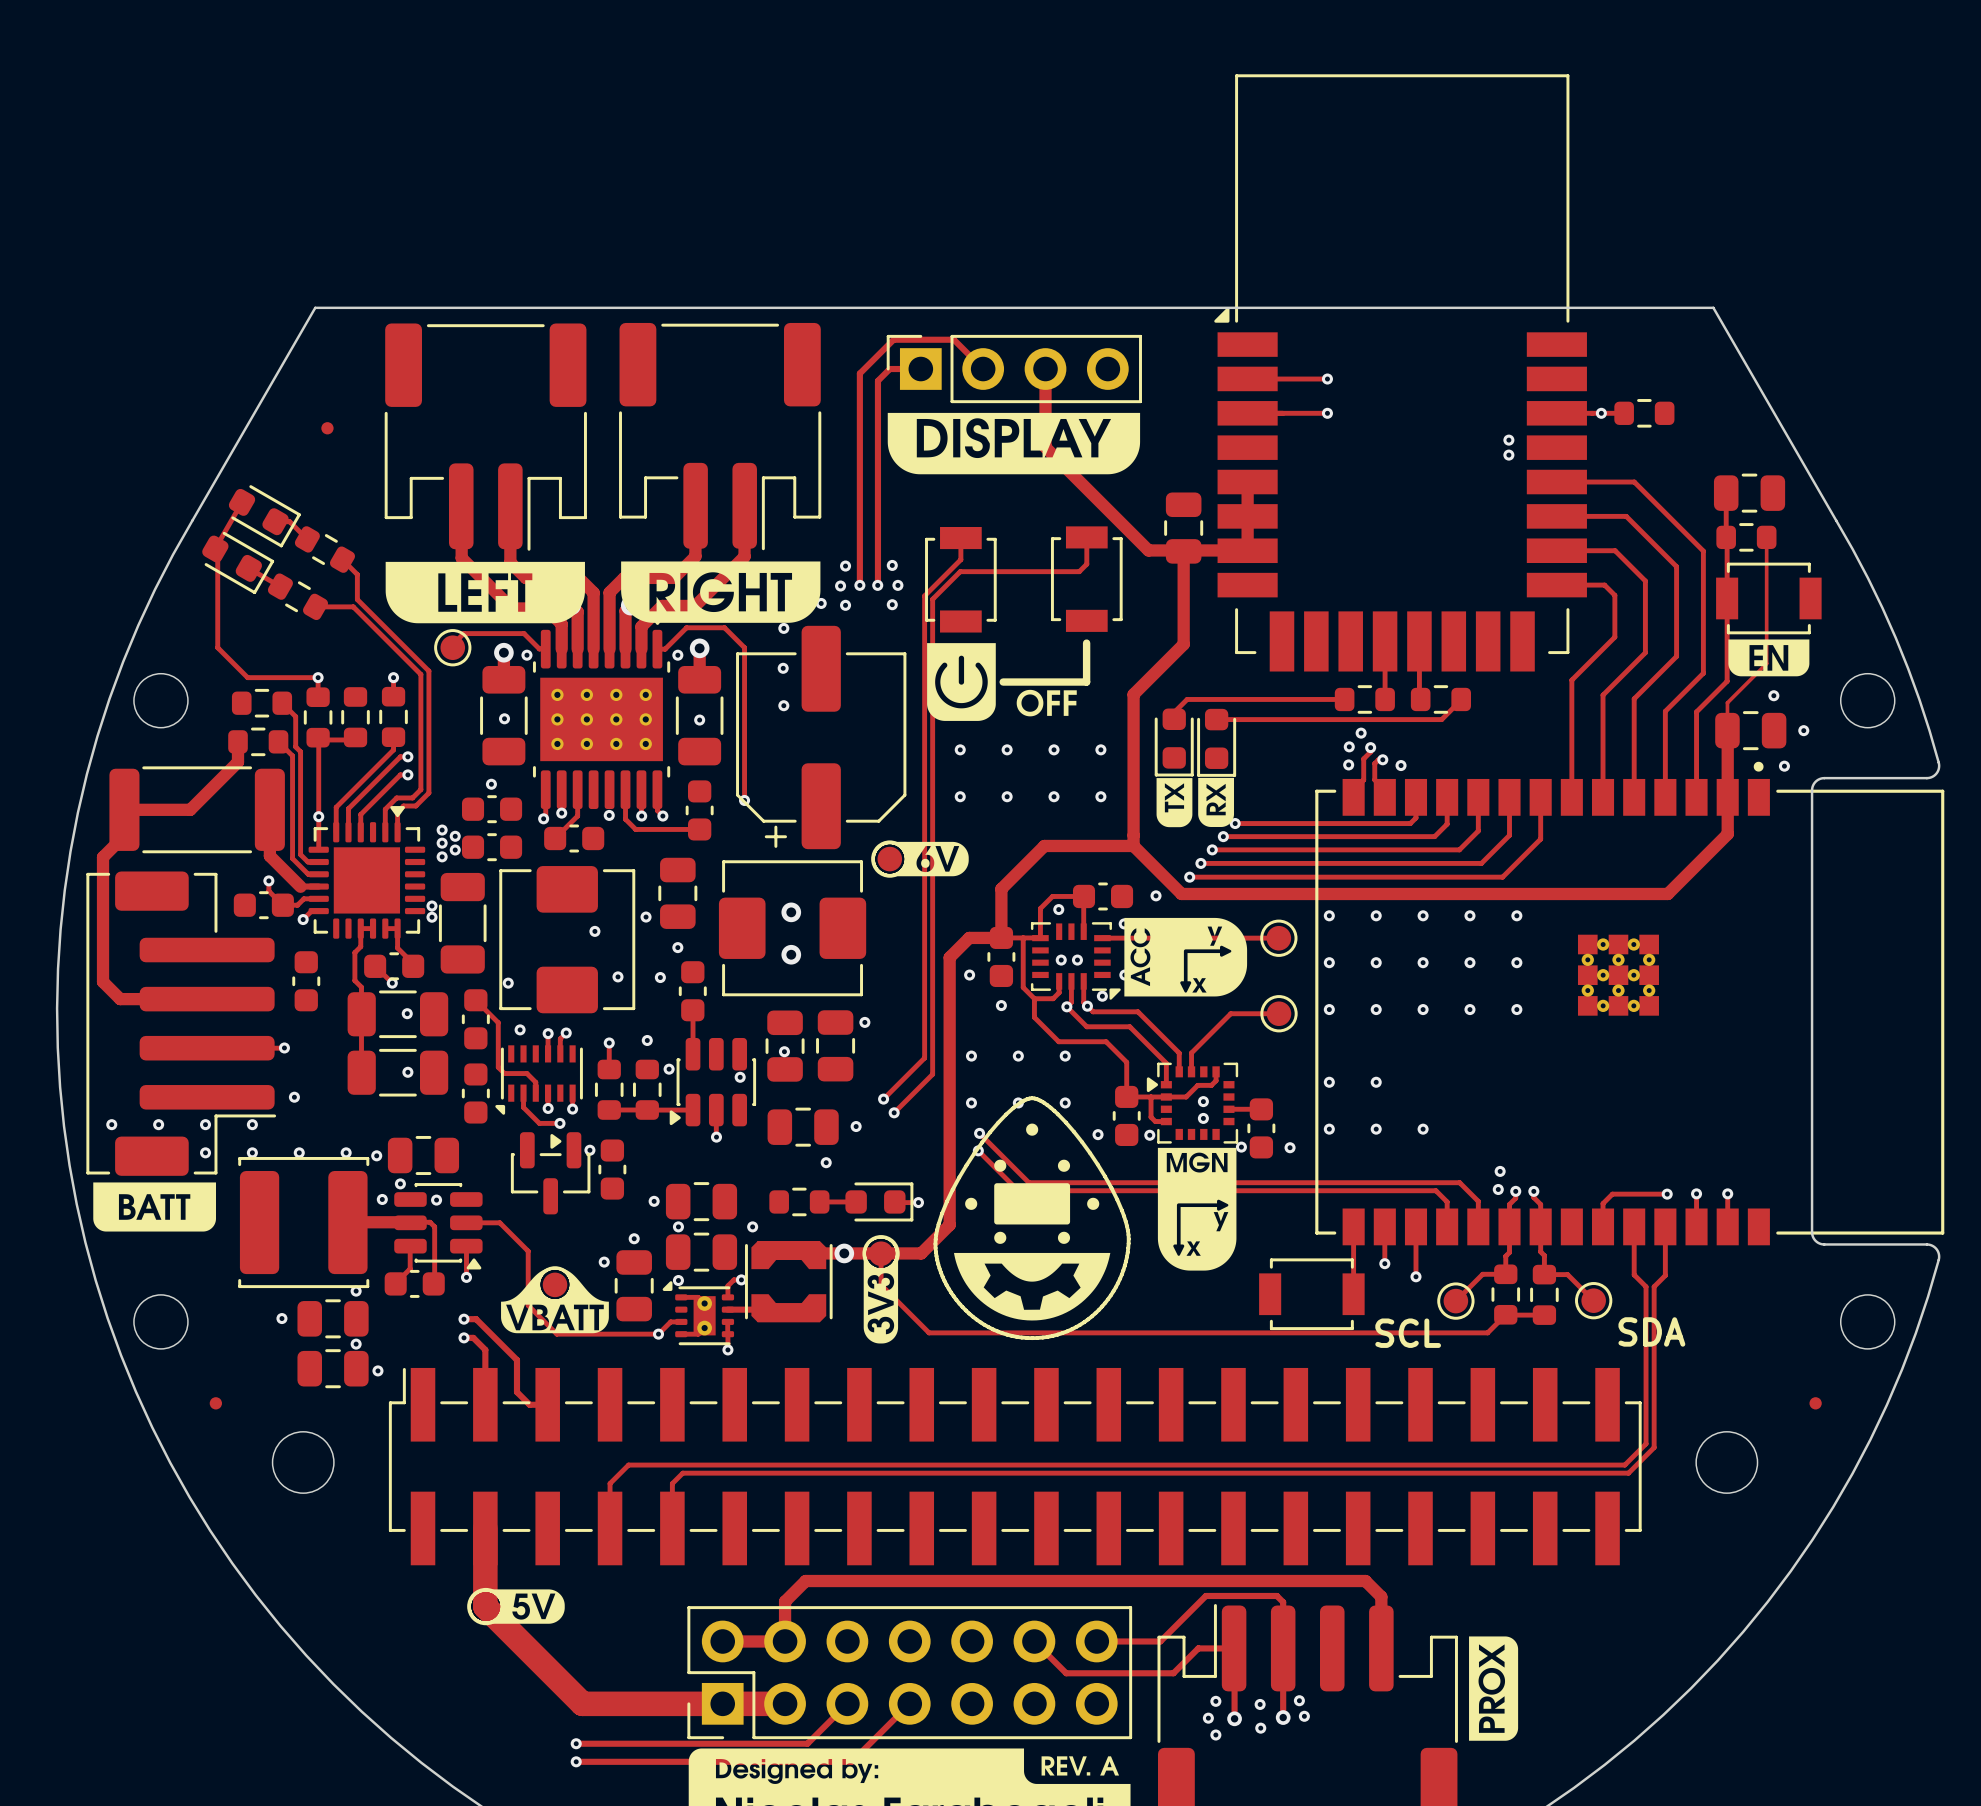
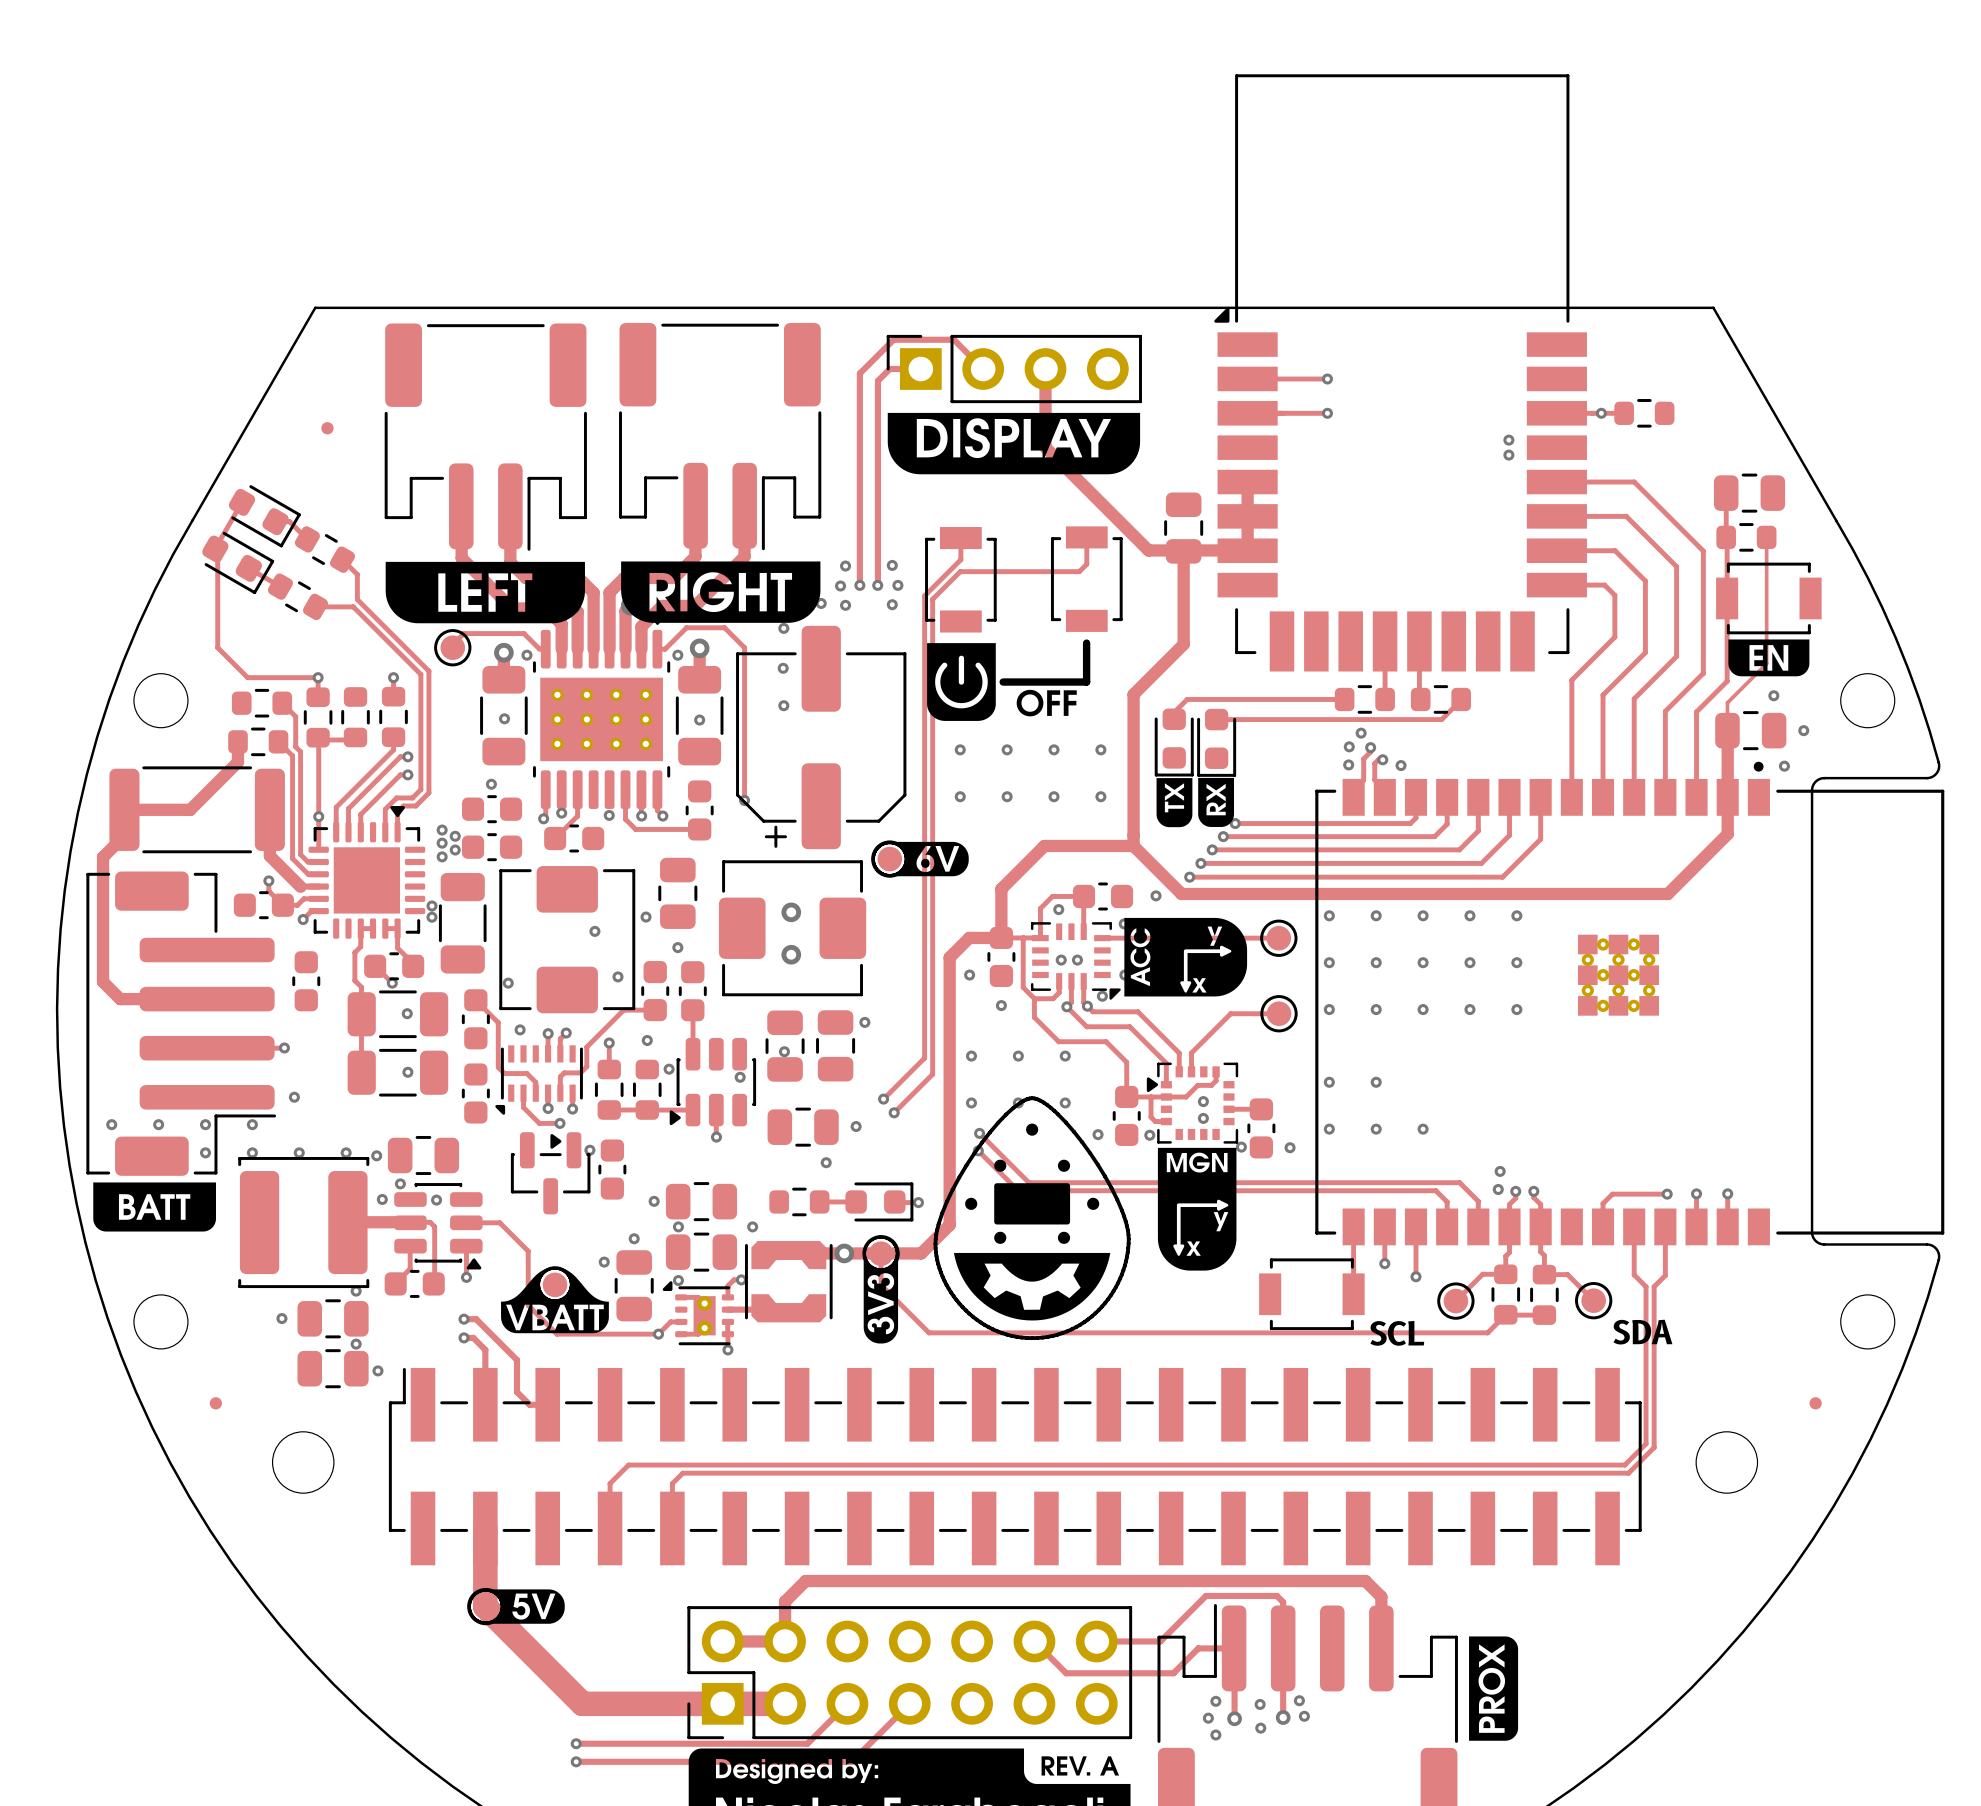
via: (660, 977) -> none
part: none -> (655, 991)
track: none -> (655, 1010) (623, 1010) (586, 1047) (586, 1066) (580, 1072) (564, 1072) (560, 1076) (560, 1093)

